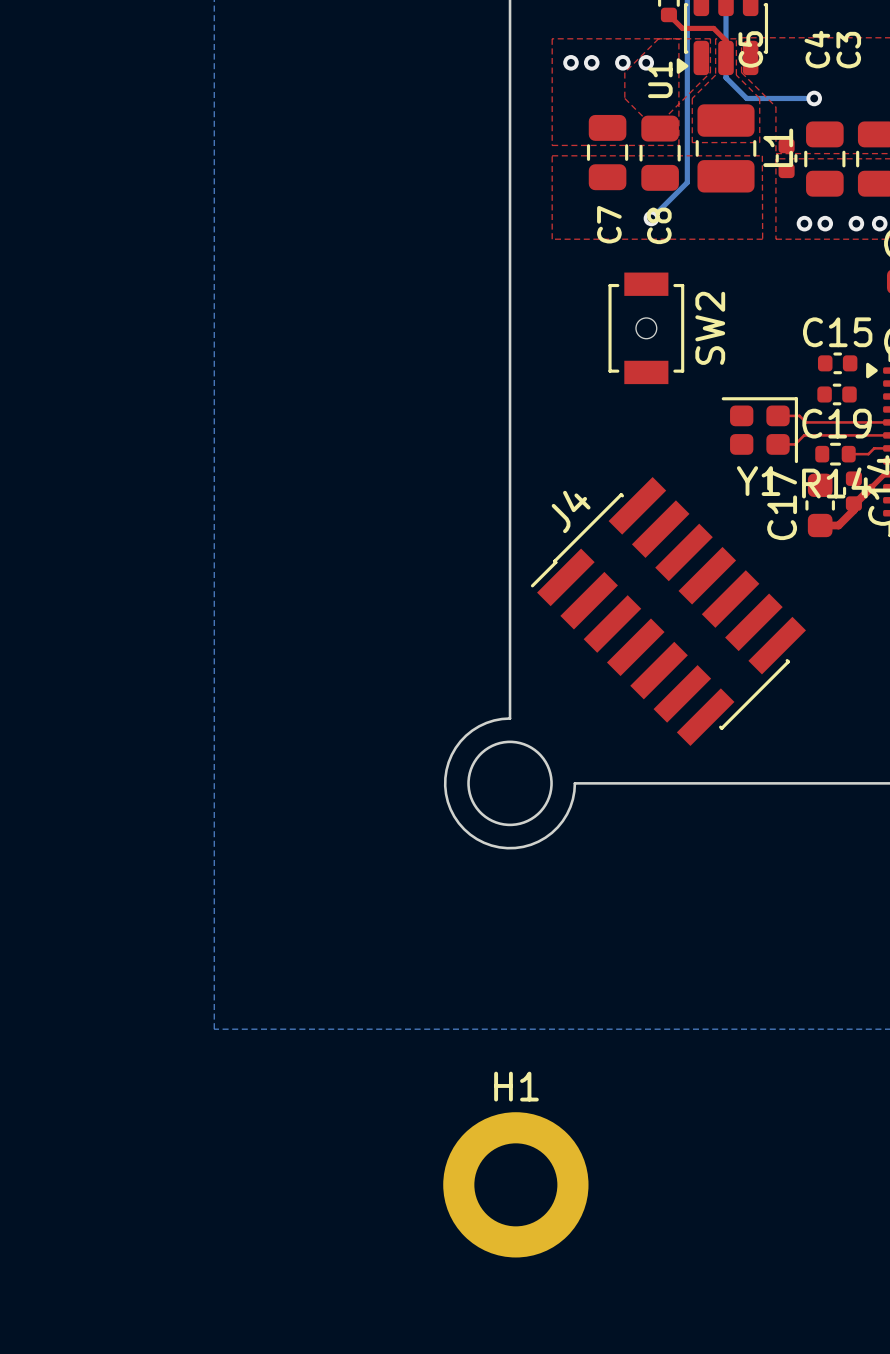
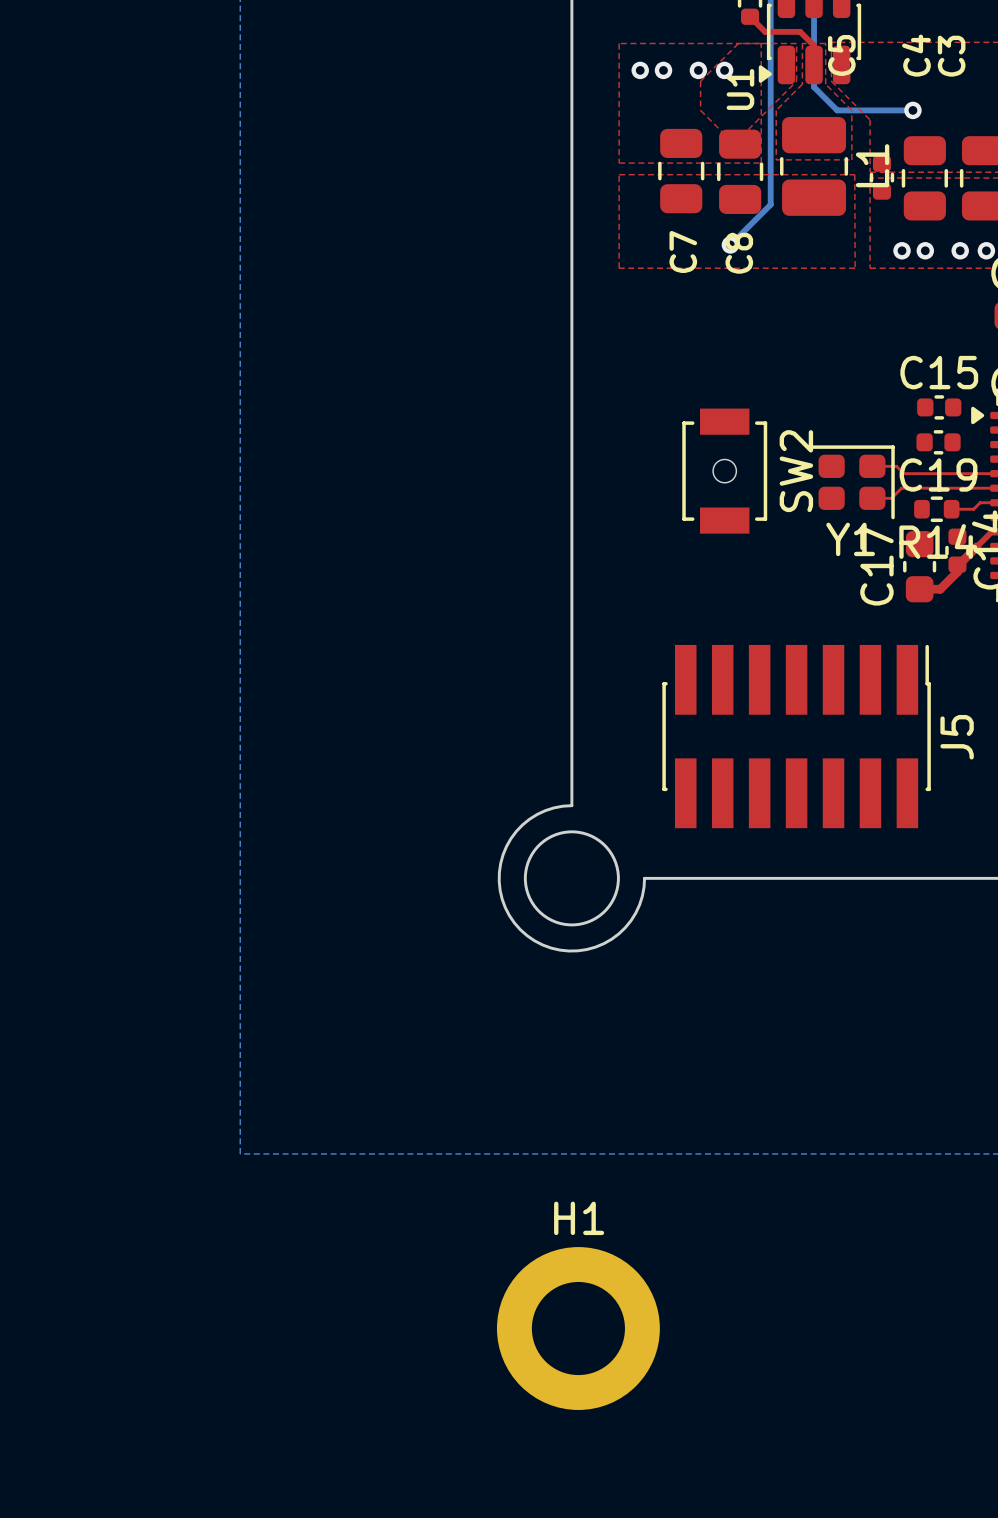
SW2 position: (646, 328) -> (724, 471)
J4: (668, 611) -> none
J5: none -> (796, 736)

